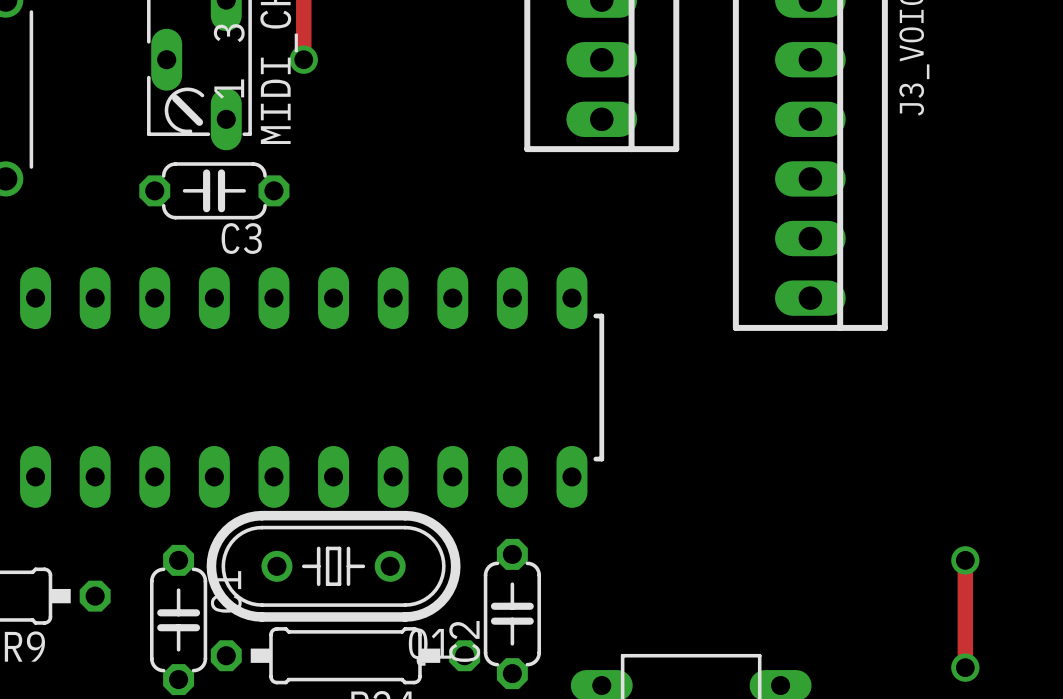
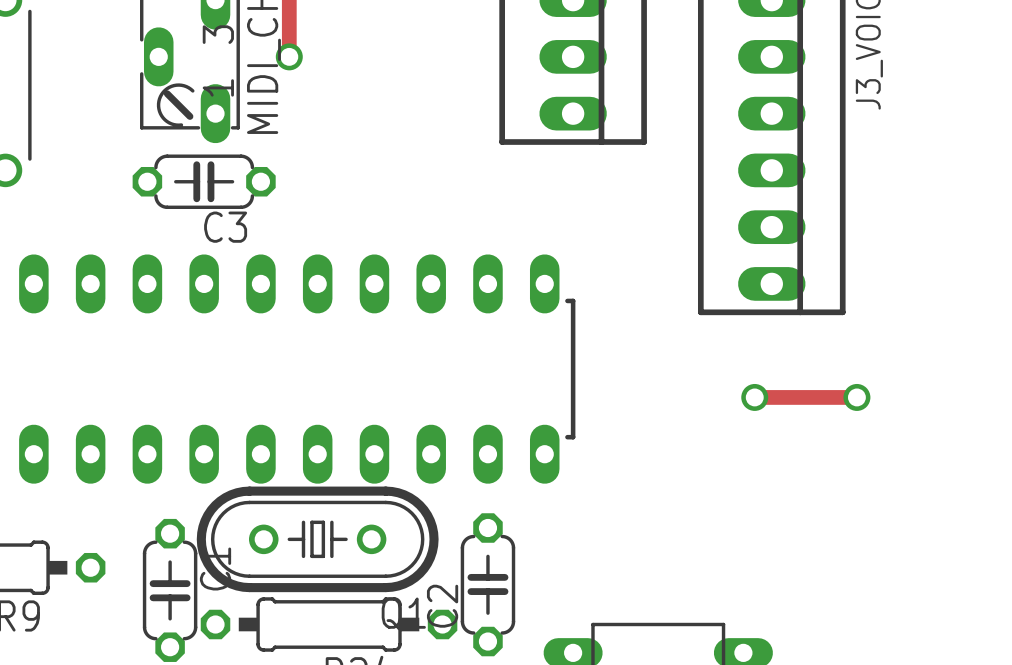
track: none -> (754, 397) (856, 397)
via: none -> (754, 397)
via: none -> (856, 397)
track: (965, 560) (965, 667) -> none
via: (965, 560) -> none
via: (965, 667) -> none

